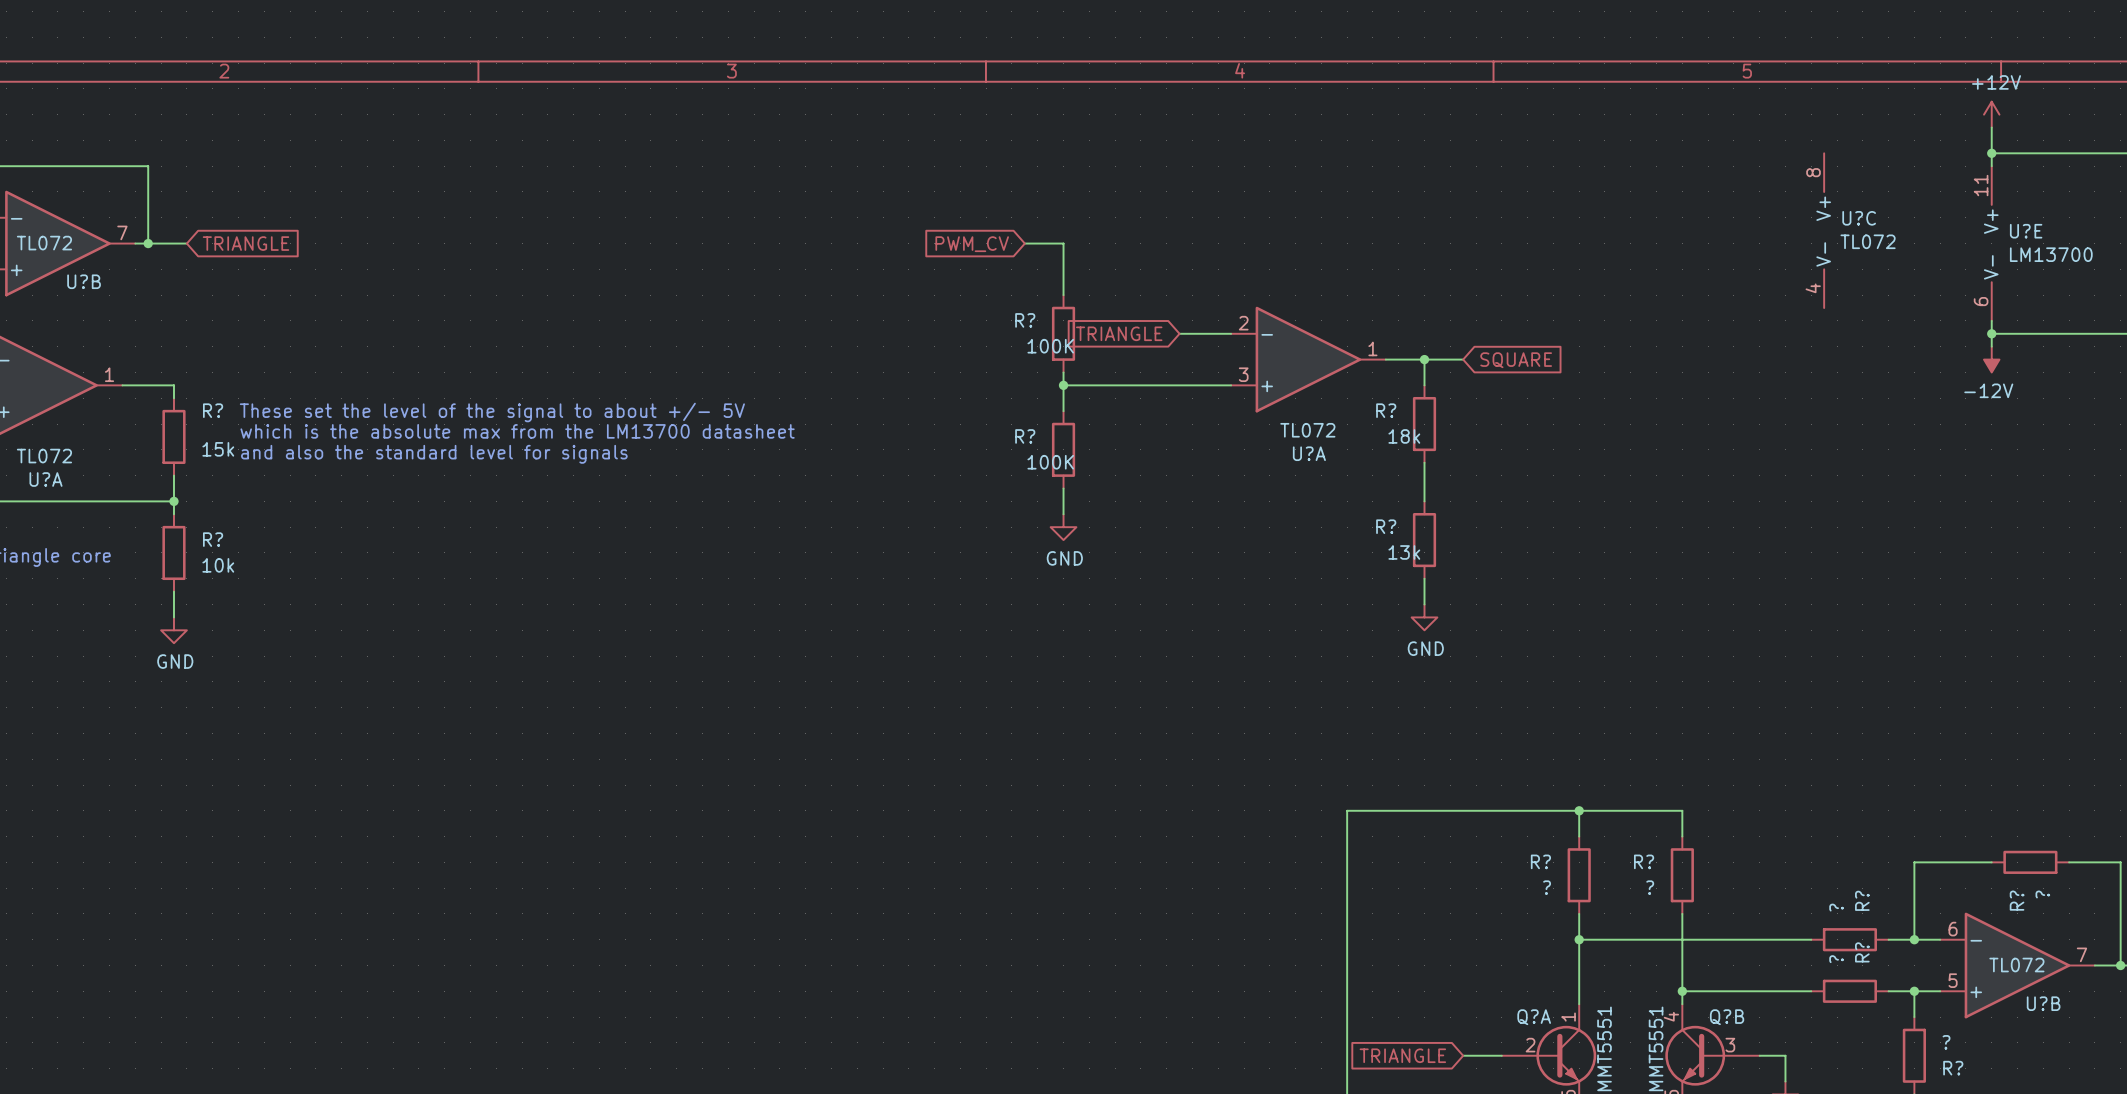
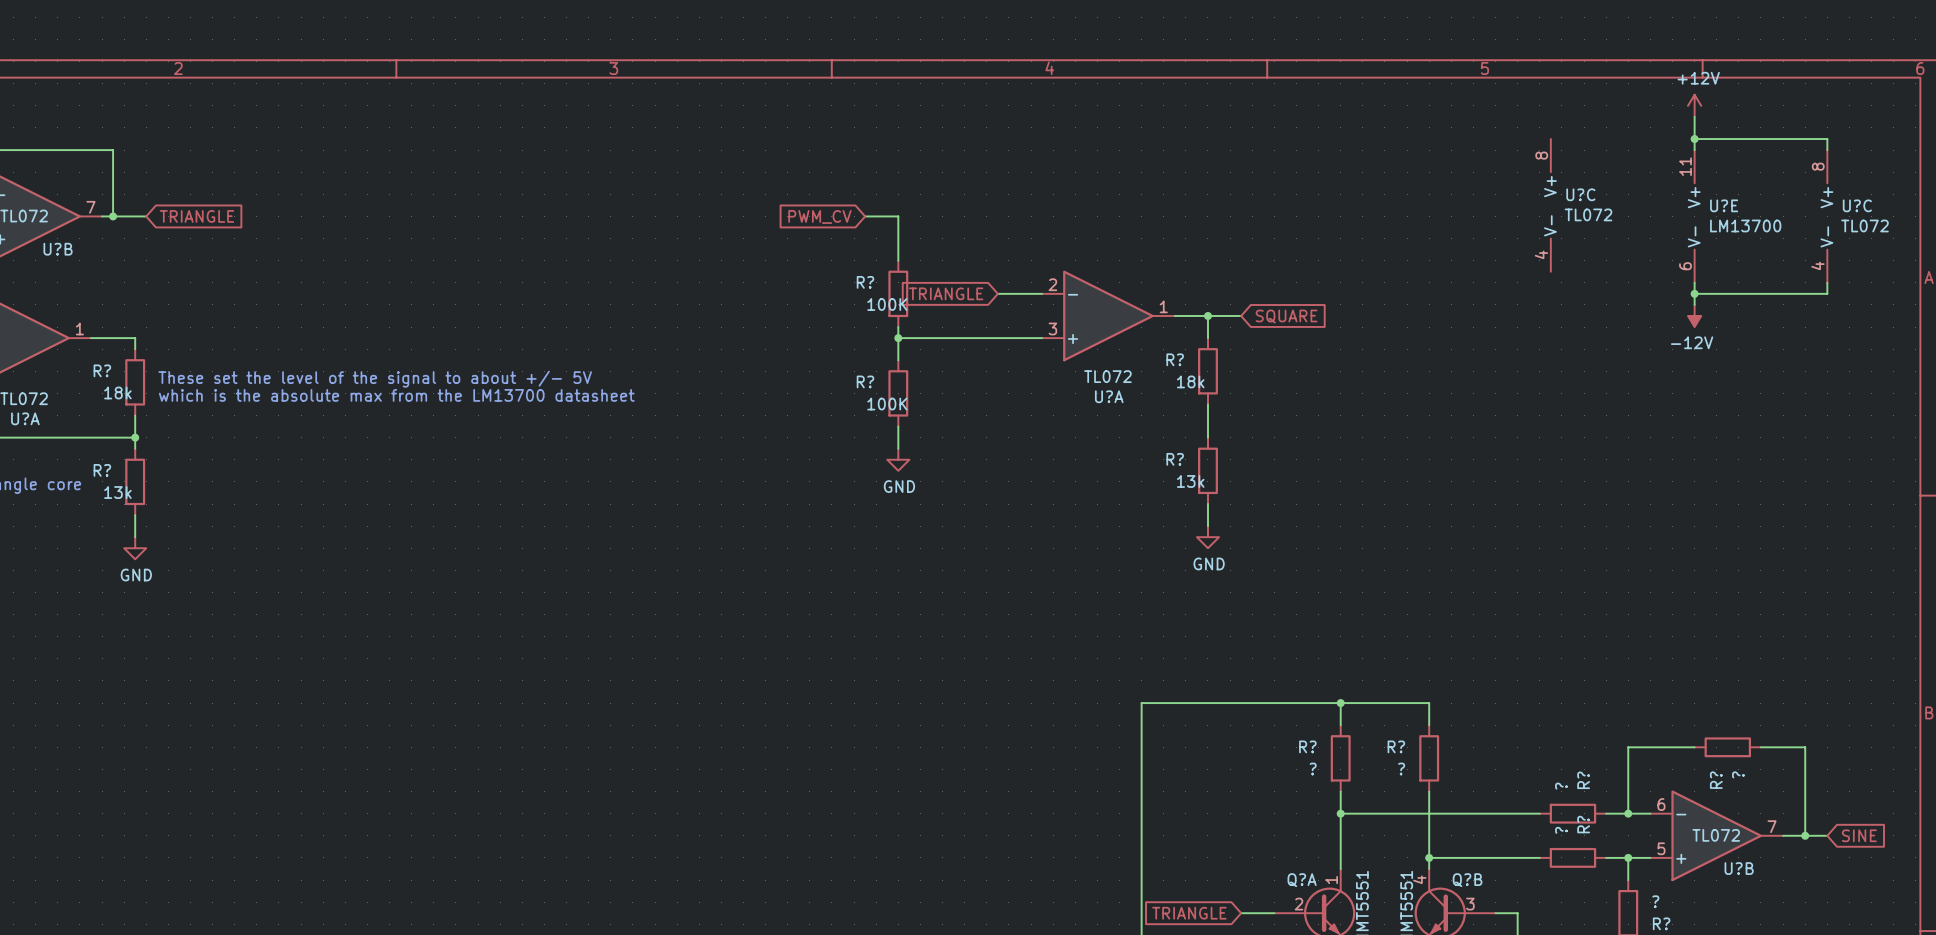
R? name position: R? (213, 410) -> R? (102, 370)
text position: These set the level of the signal to about +/- 5V (492, 412) -> These set the level of the signal to about +/- 5V (375, 379)
text position: which is the absolute max from the LM13700 datasheet (517, 431) -> which is the absolute max from the LM13700 datasheet (396, 395)
R? value: 15k (218, 449) -> 18k (117, 392)
text: and also the standard level for signals (434, 454) -> none
R? name position: R? (213, 539) -> R? (102, 470)
R? value: 10k (218, 565) -> 13k (117, 492)

